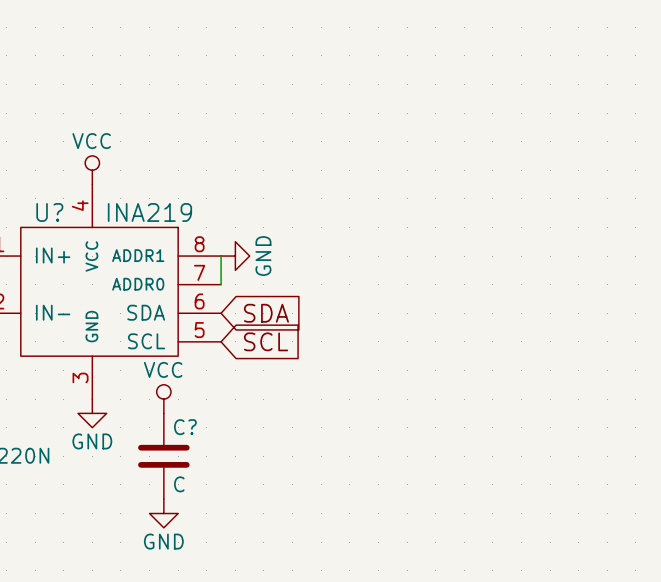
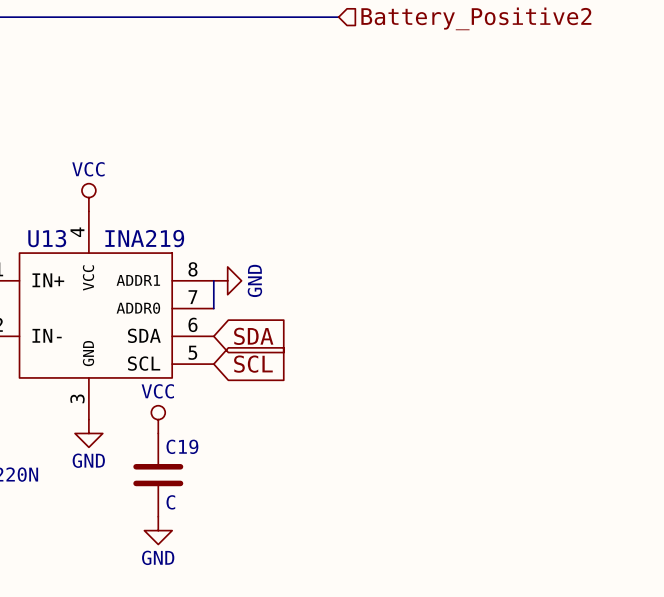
U? name: U? (49, 212) -> U13 (47, 238)
C? name: C? (185, 427) -> C19 (182, 446)

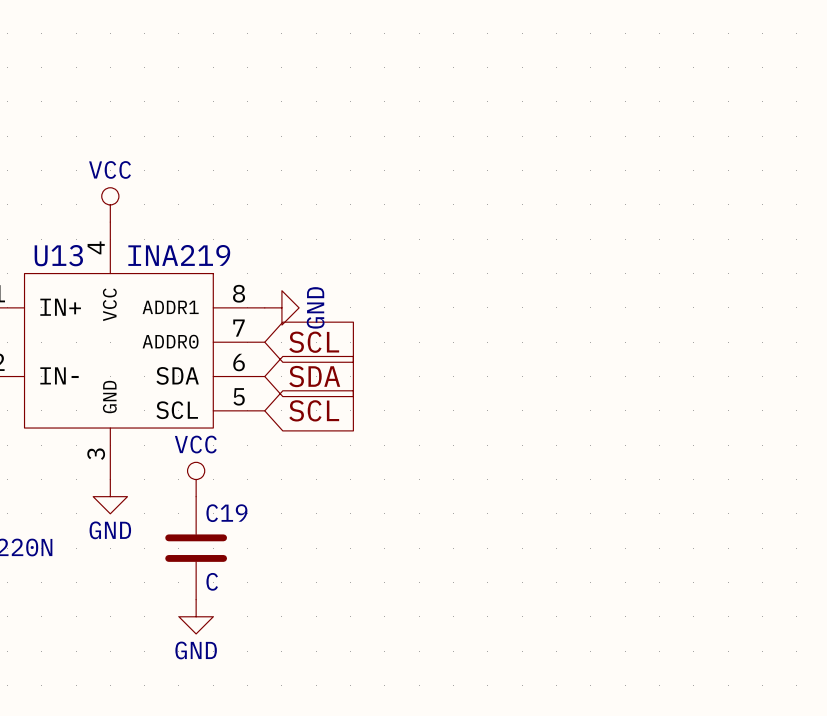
wire: (213, 280) (213, 308) -> none
global label: none -> SCL (314, 342)

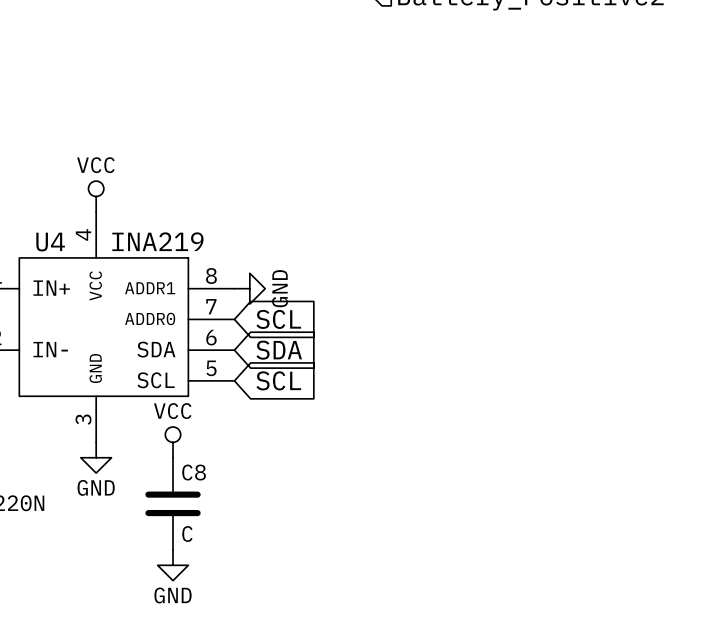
U13 name: U13 (58, 255) -> U4 (50, 242)
C19 name: C19 (226, 513) -> C8 (194, 472)

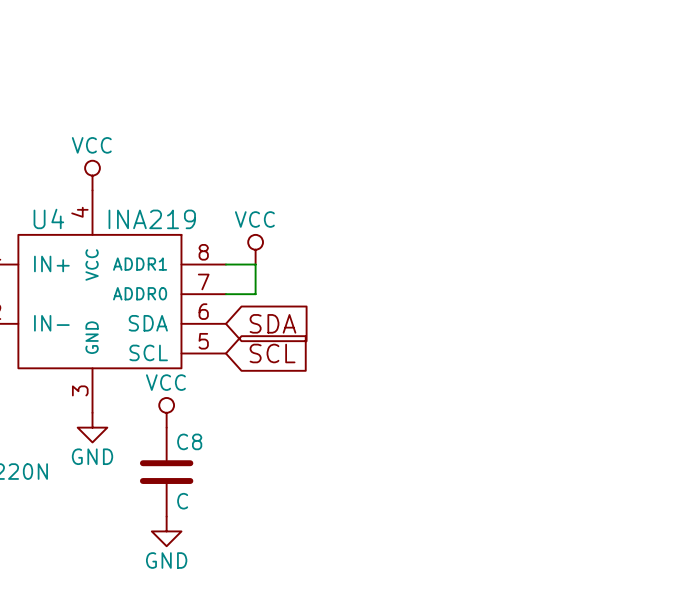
power symbol: none -> VCC (255, 249)
wire: none -> (225, 264) (255, 264) (255, 294) (225, 294)
power symbol: GND (249, 288) -> none
global label: SCL (278, 319) -> none

